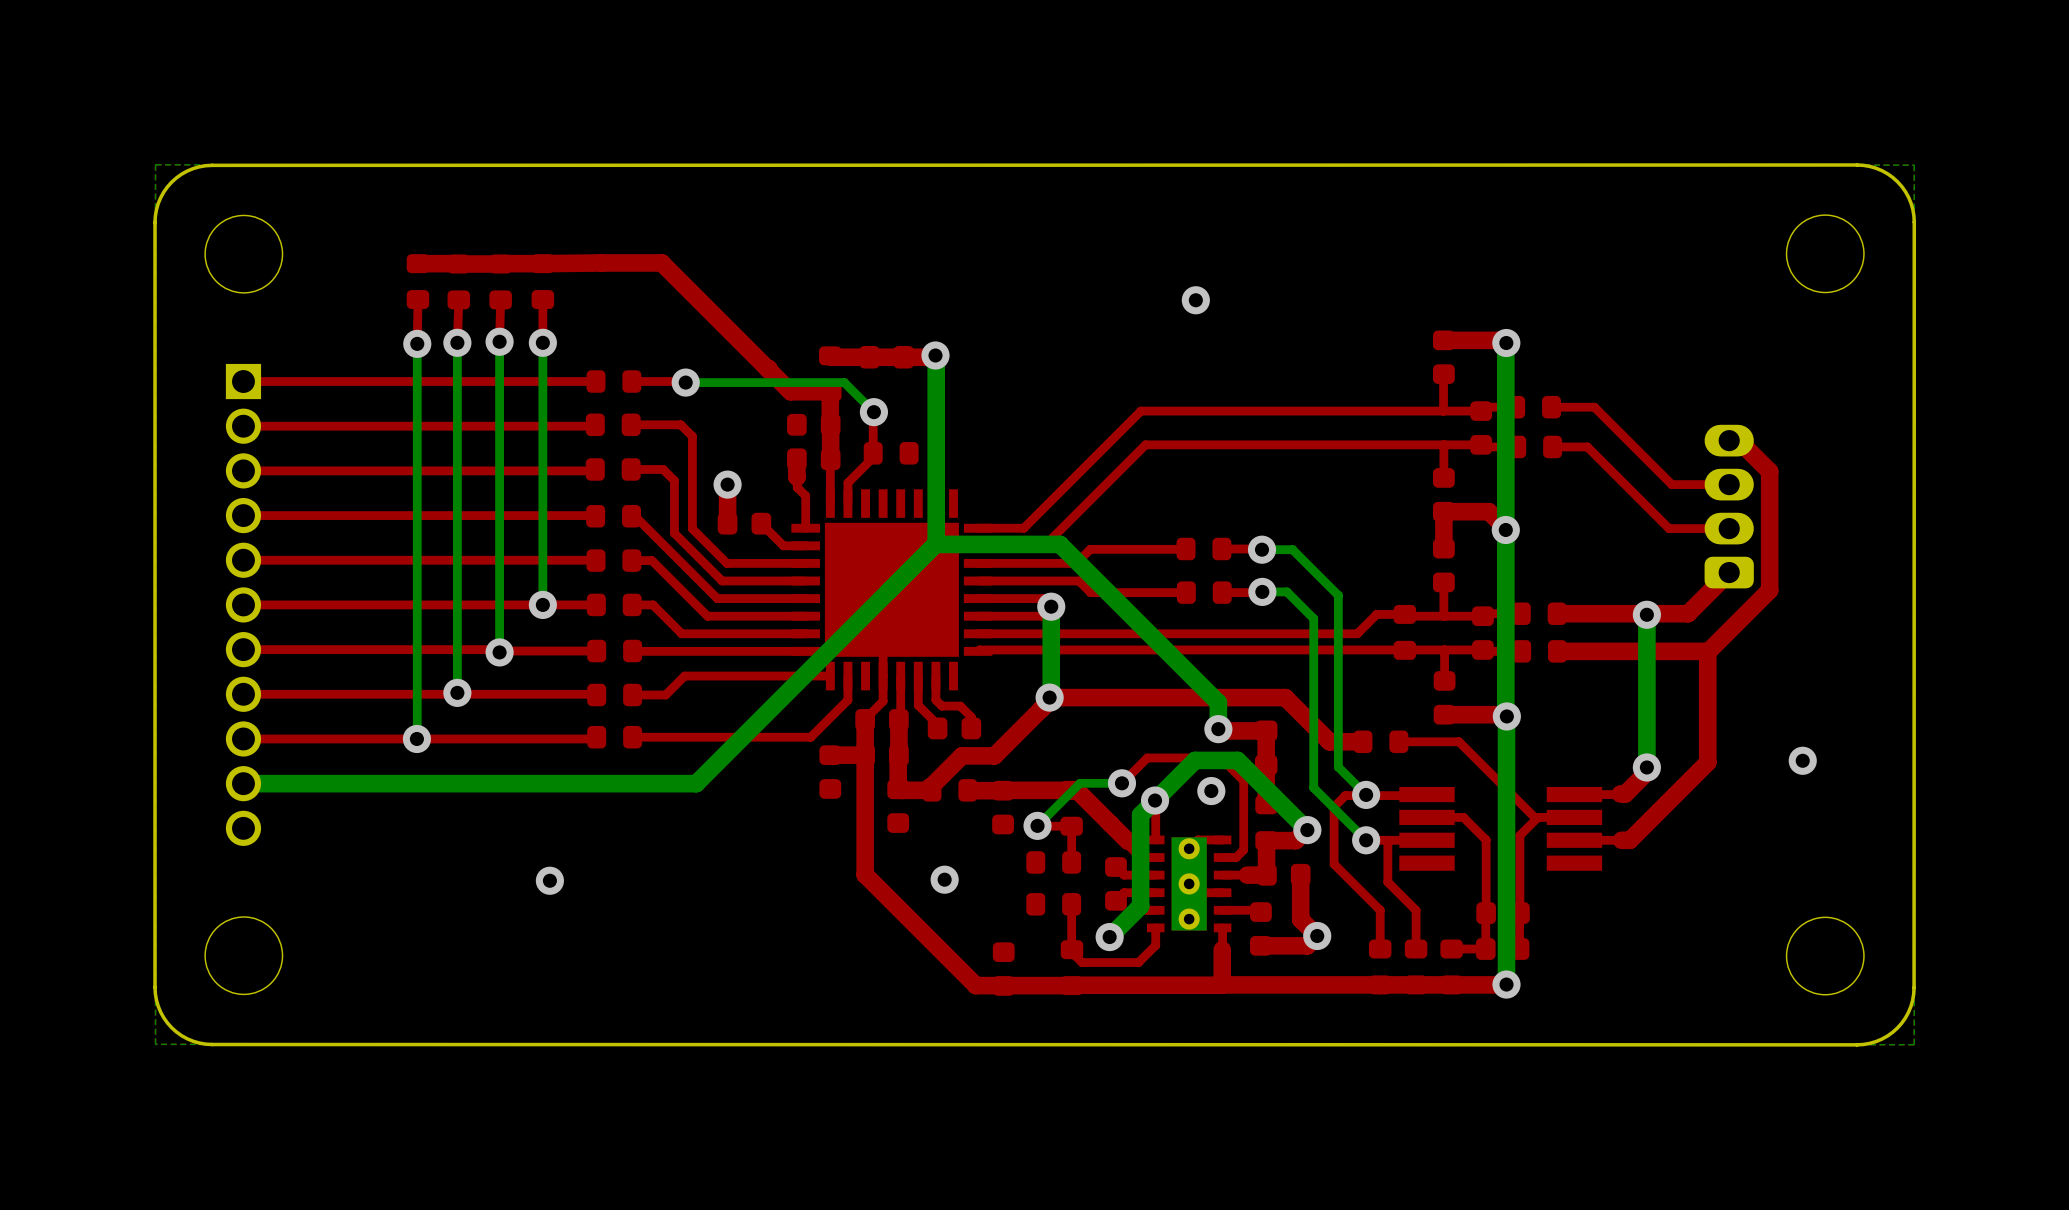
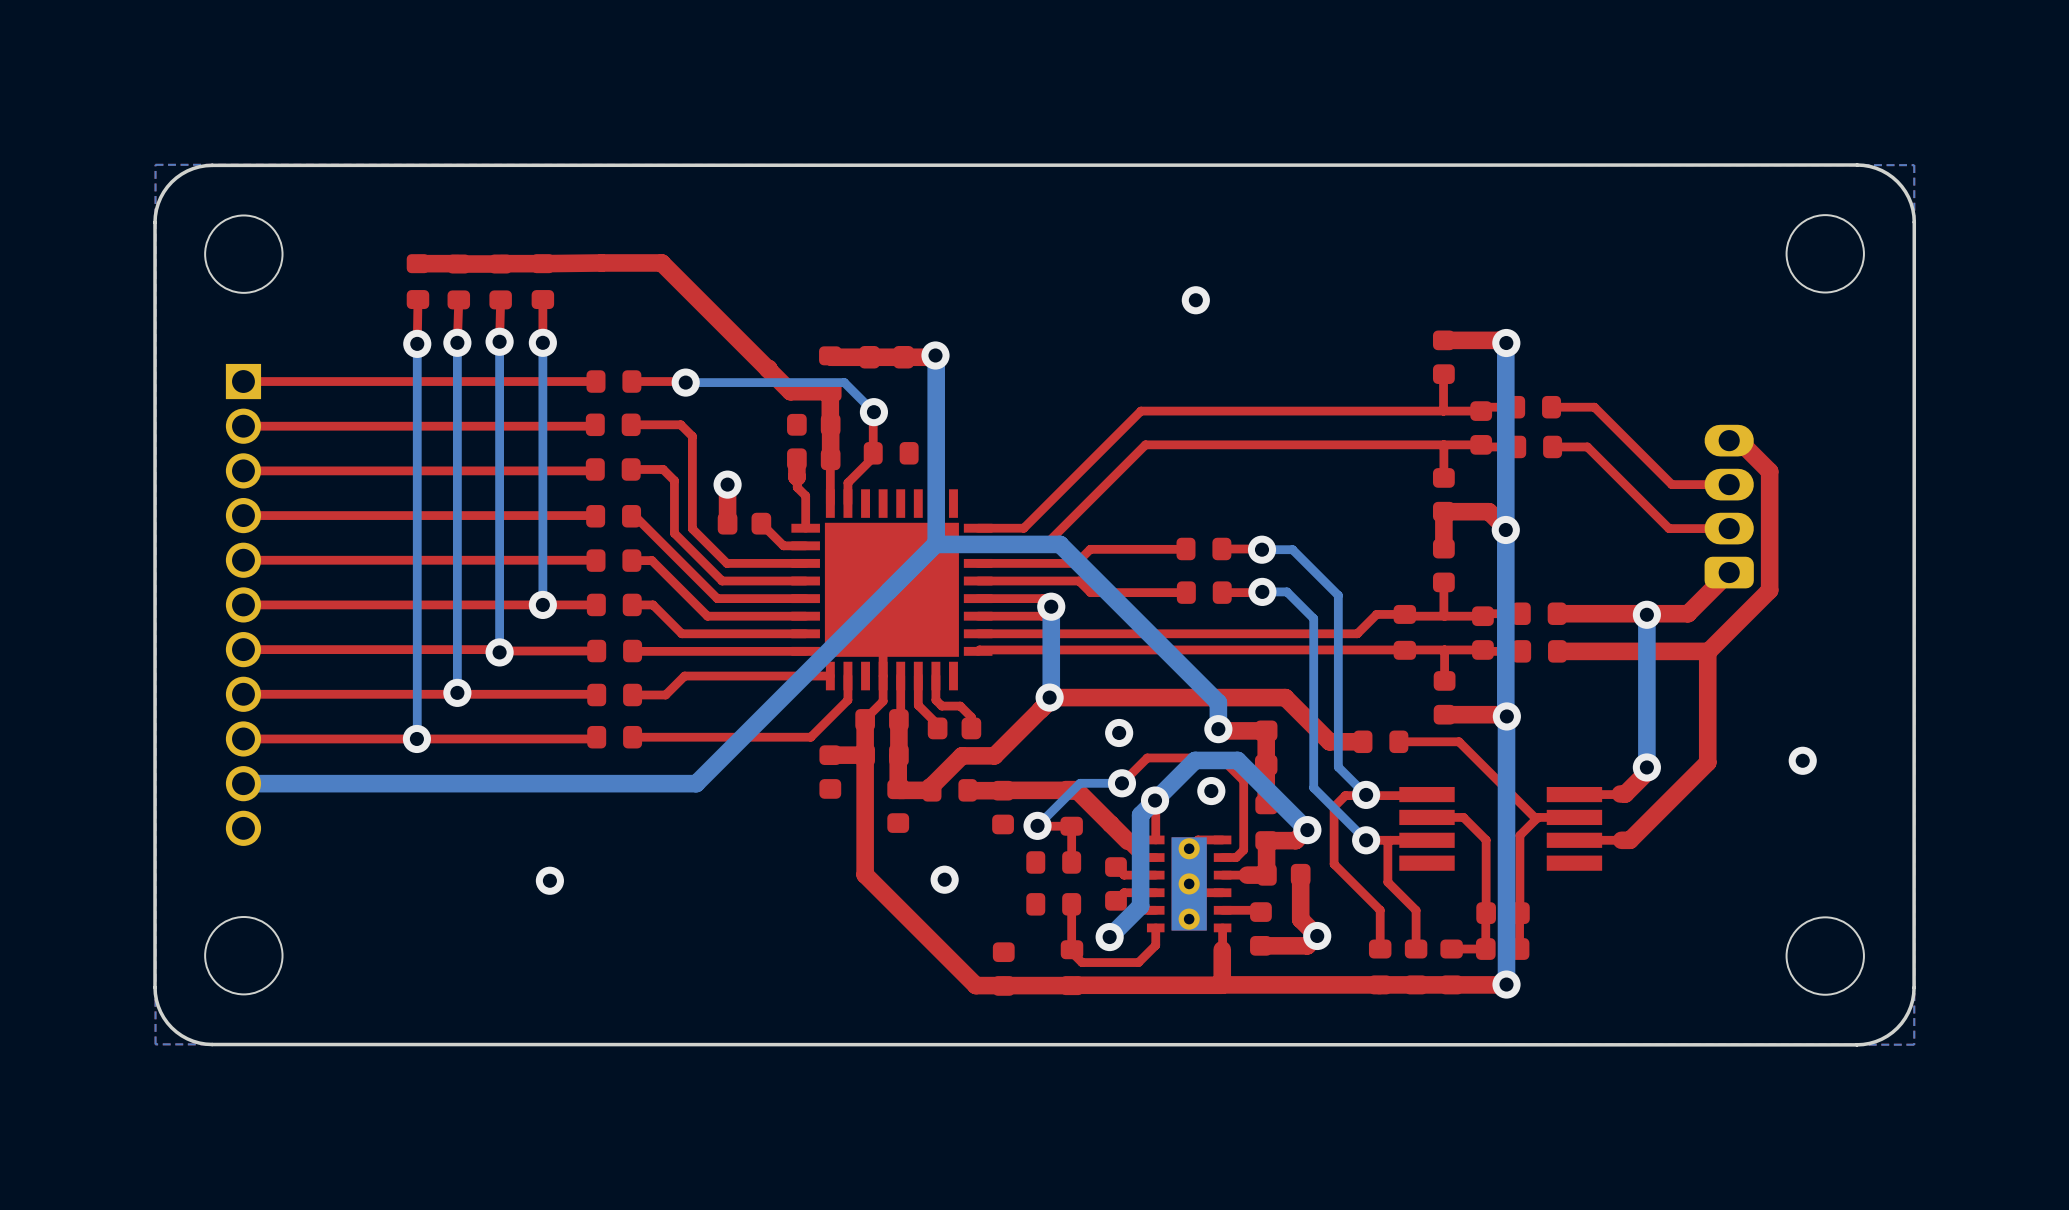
via: none -> (1119, 732)

